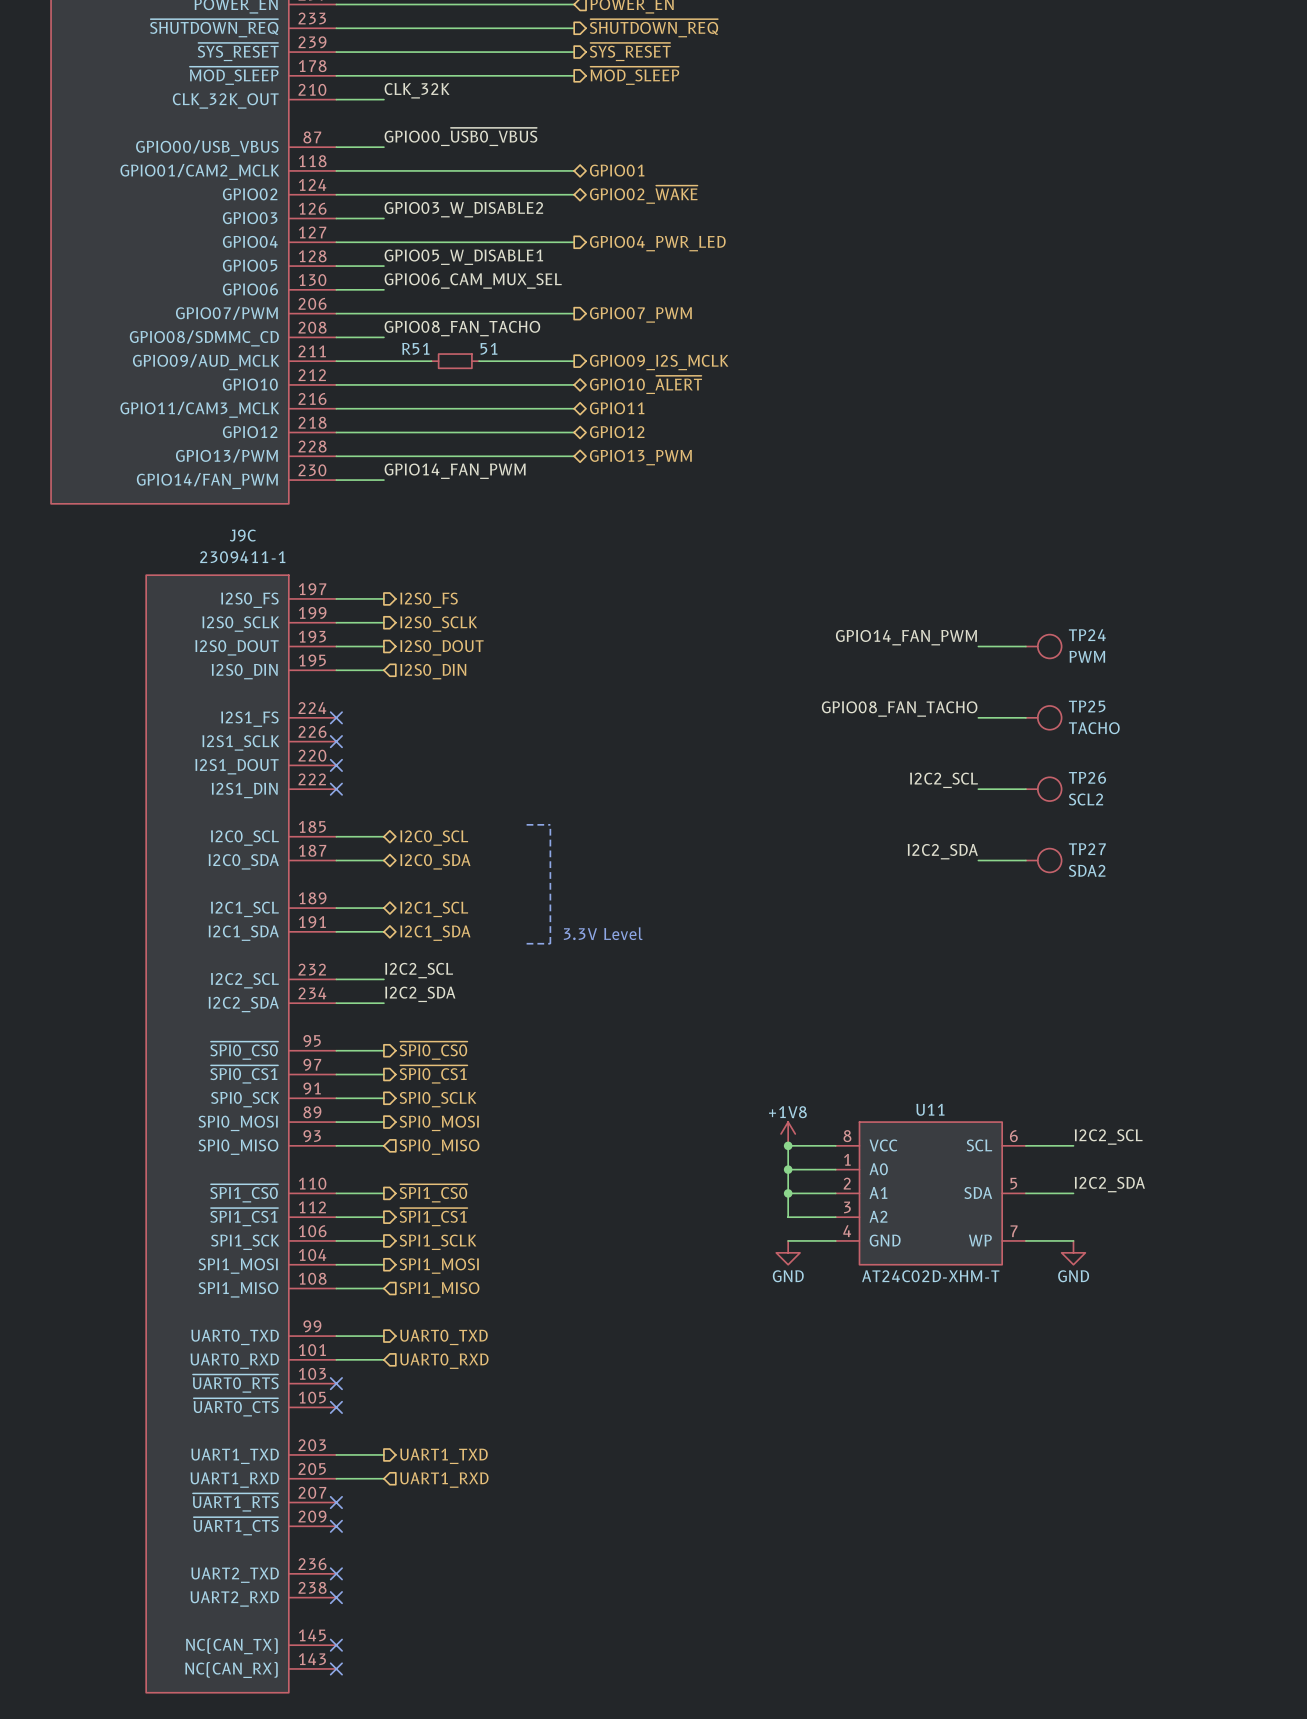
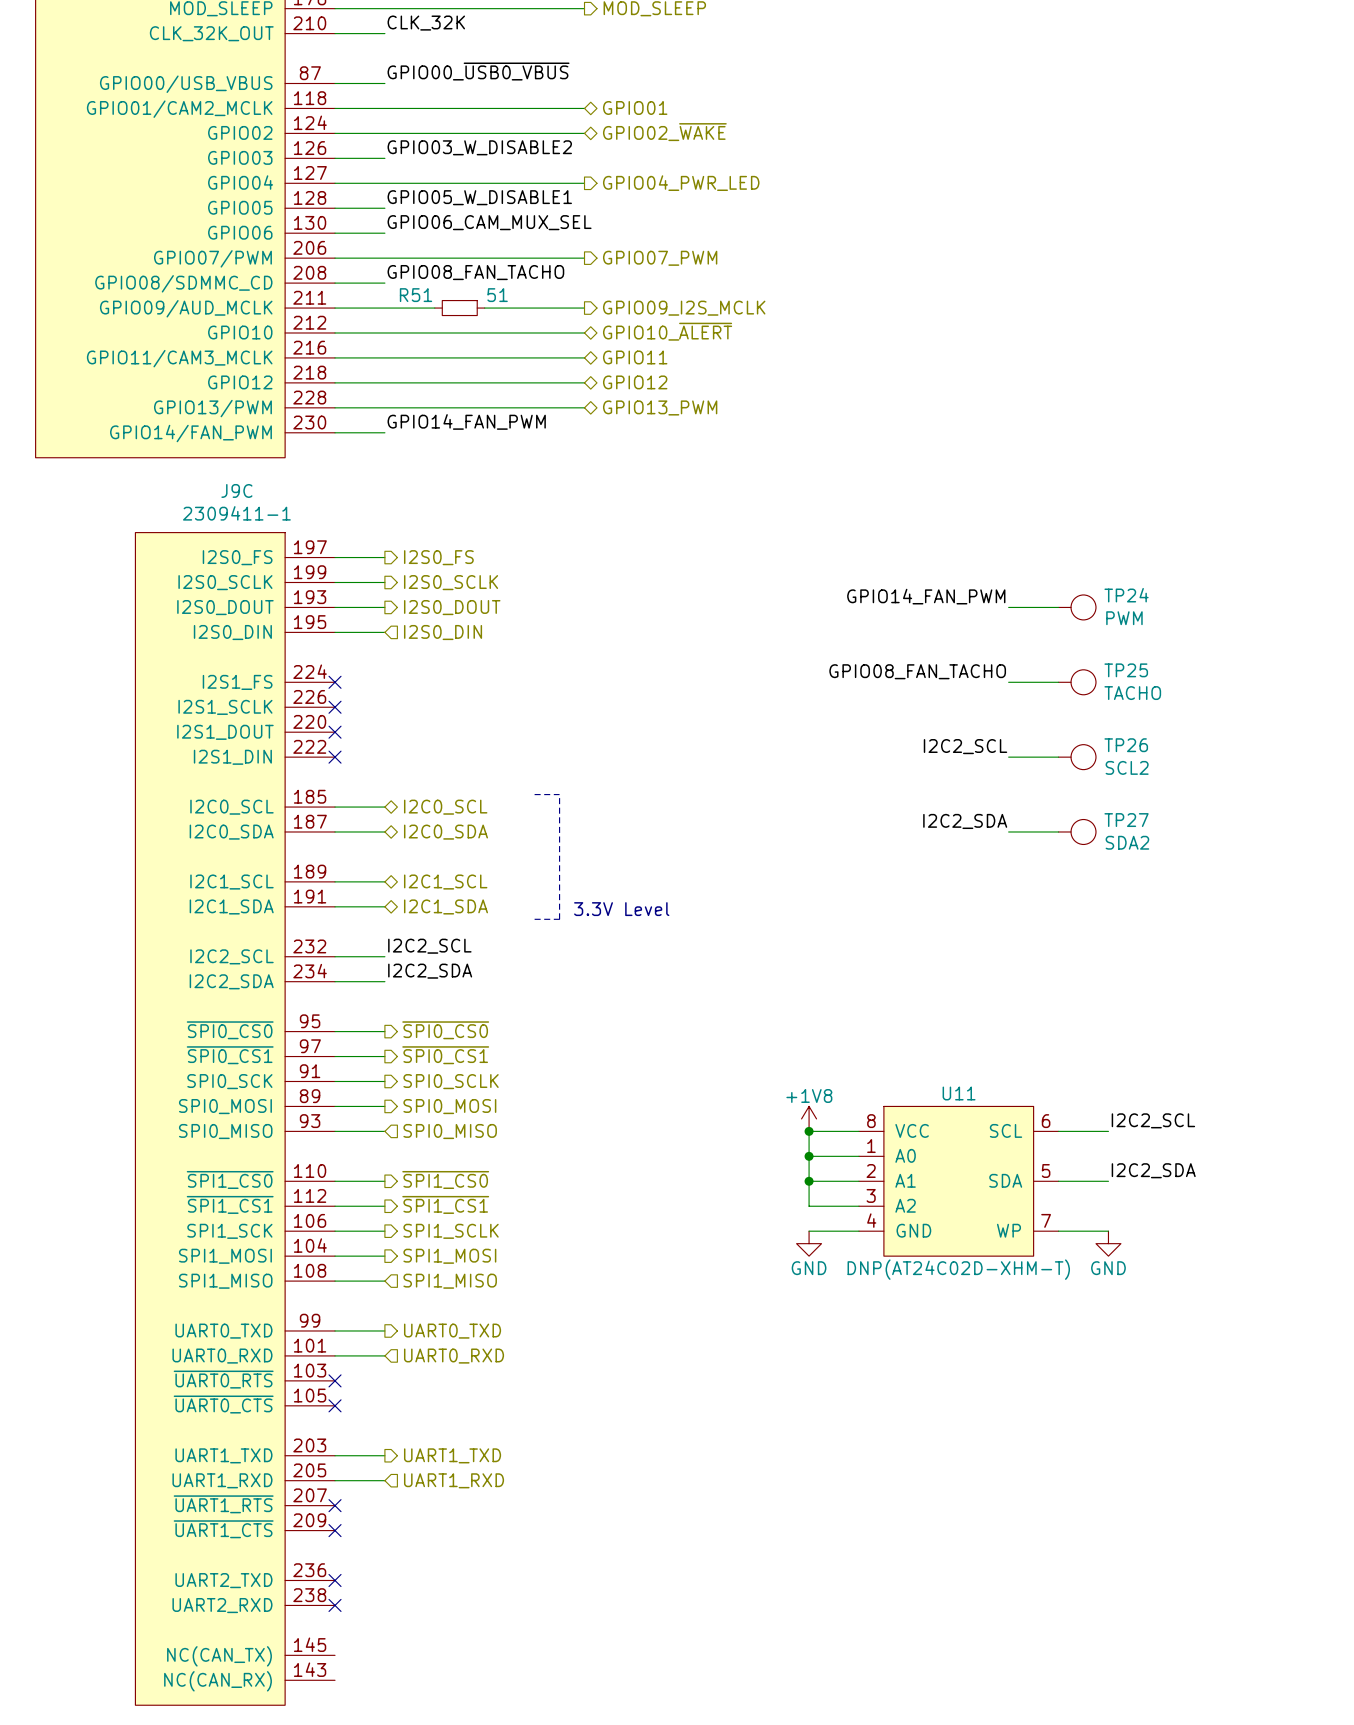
U11 value: AT24C02D-XHM-T (930, 1276) -> DNP(AT24C02D-XHM-T) (958, 1269)
no-connect mark: (336, 1645) -> none
no-connect mark: (336, 1668) -> none

